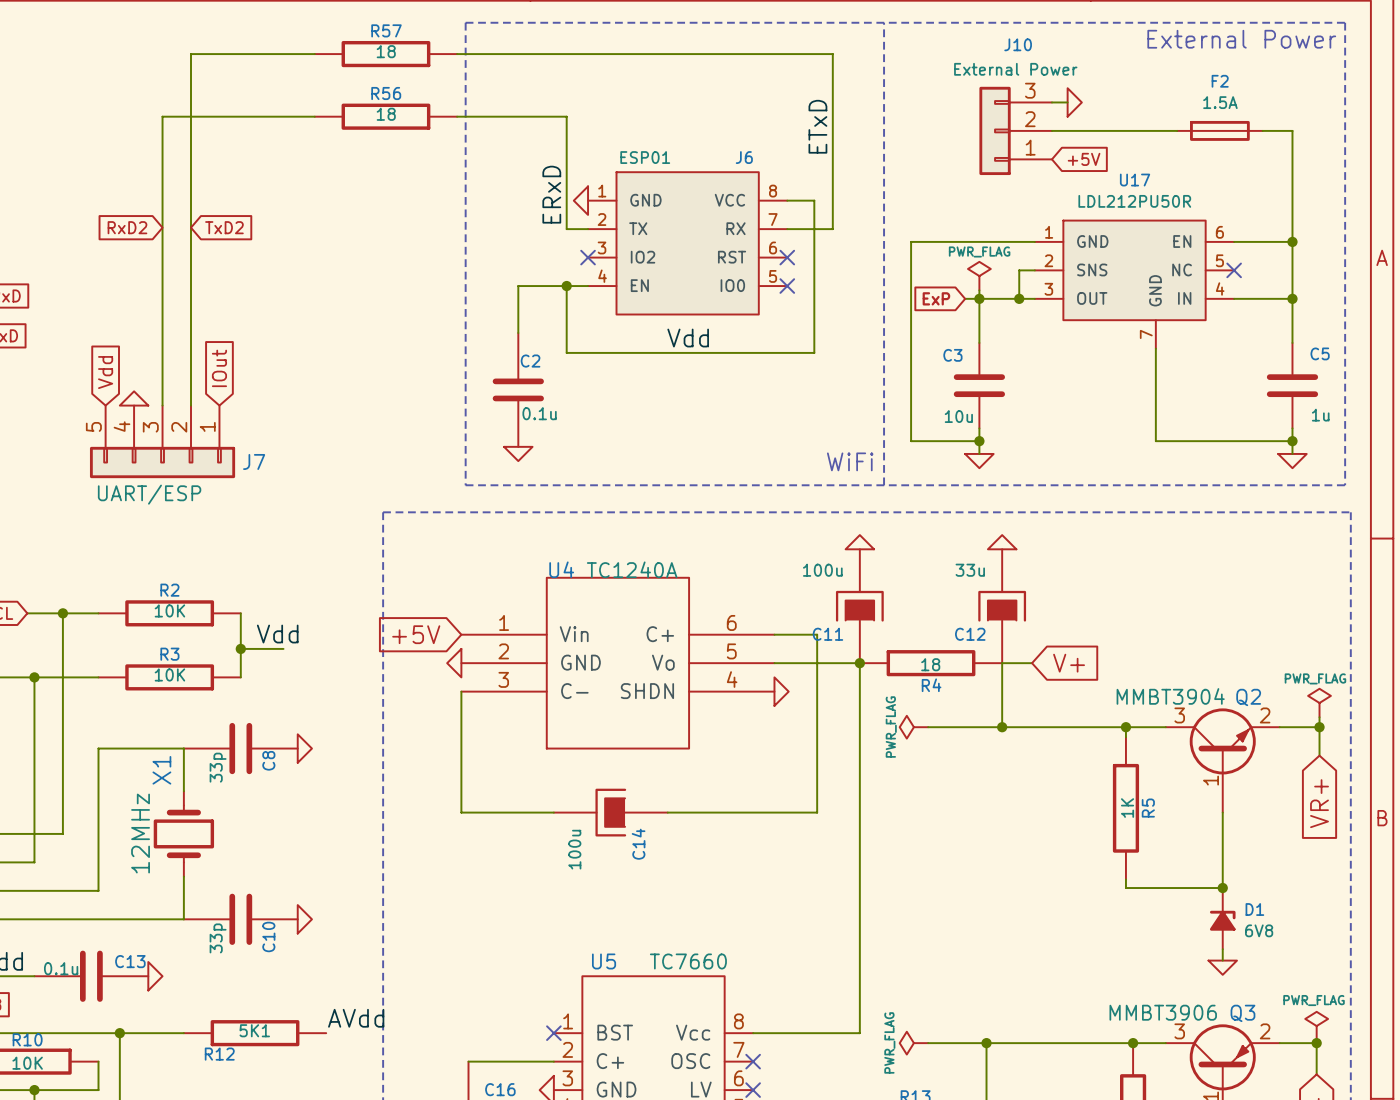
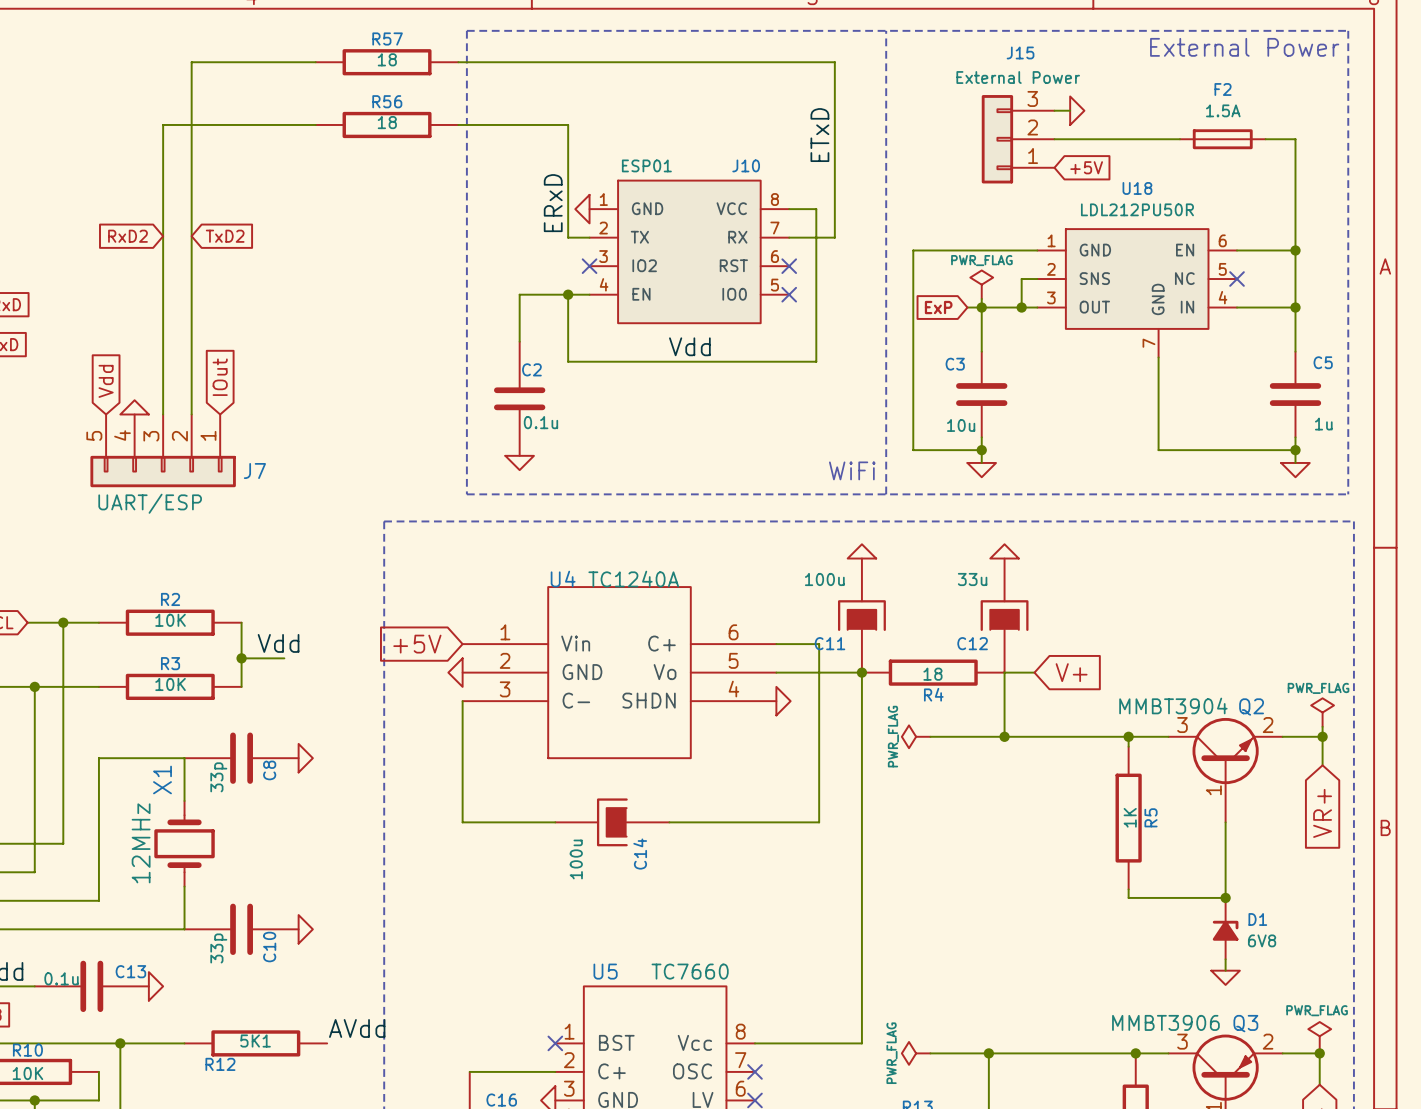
J10 name: J10 (1018, 44) -> J15 (1020, 52)
J6 name: J6 (744, 157) -> J10 (746, 165)
U17 name: U17 (1135, 180) -> U18 (1137, 188)

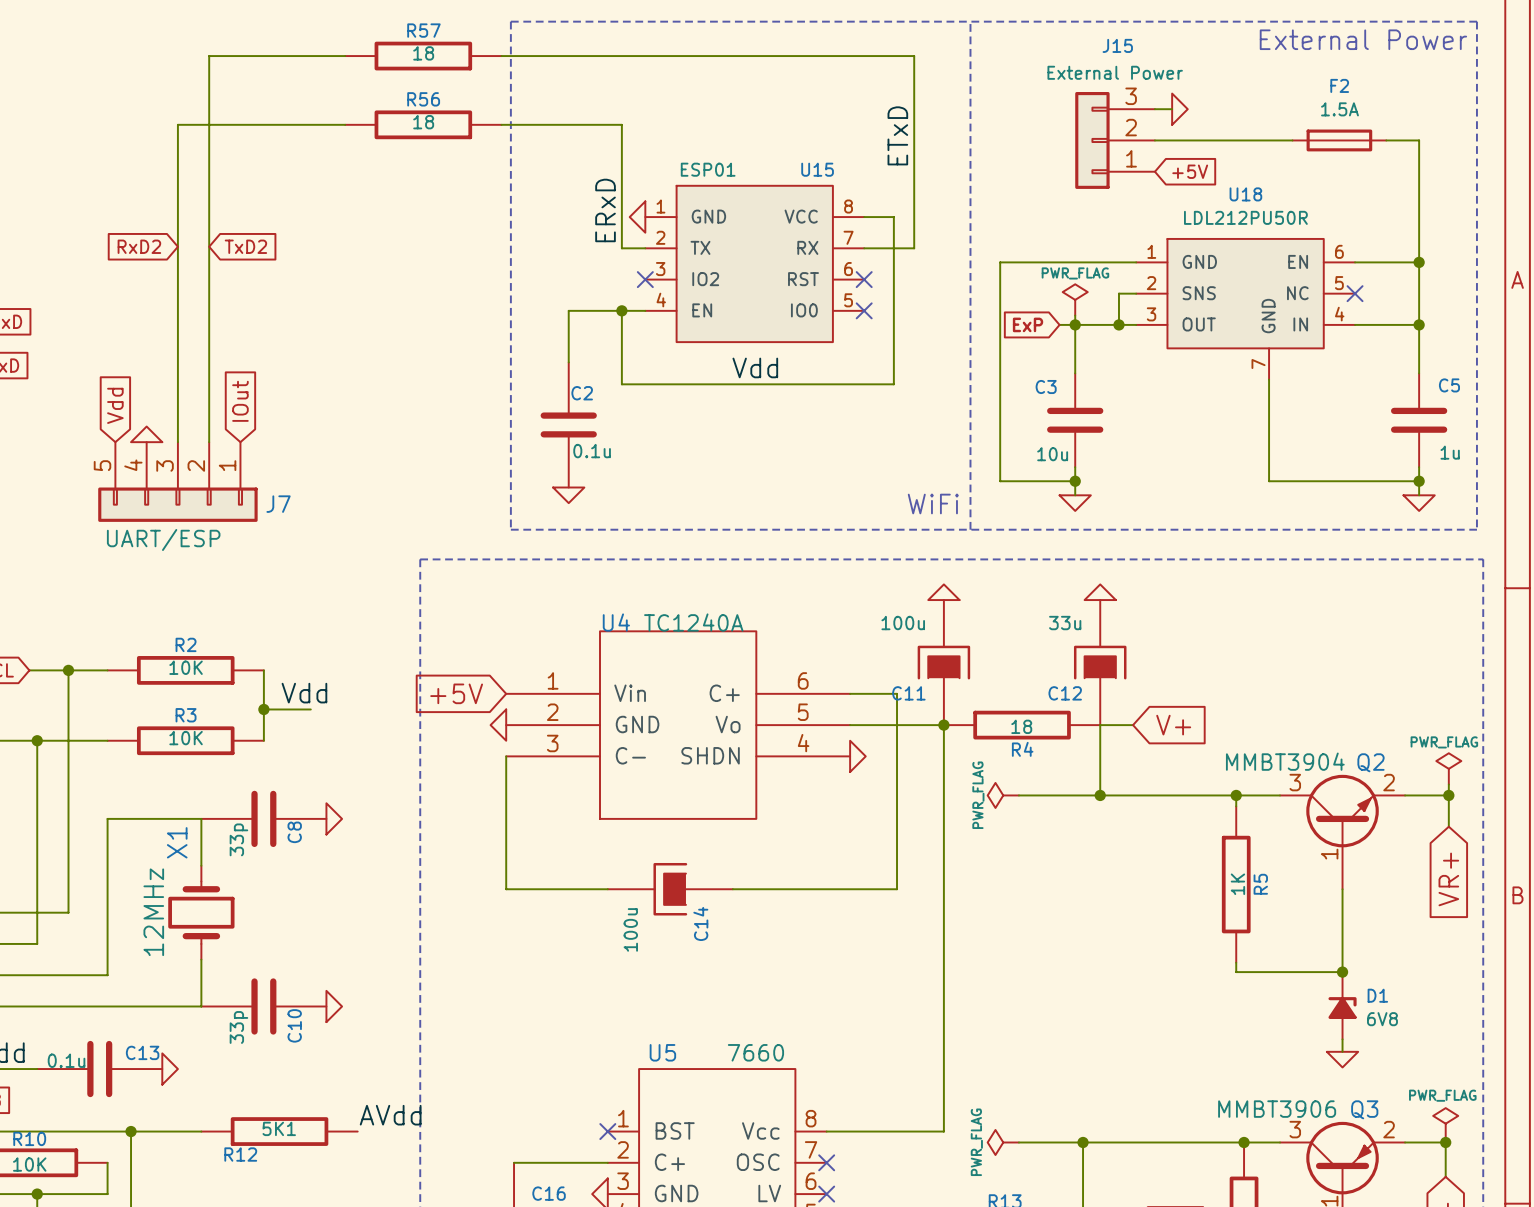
J10 name: J10 (746, 165) -> U15 (817, 169)
U5 value: TC7660 (690, 971) -> 7660 (755, 1052)

